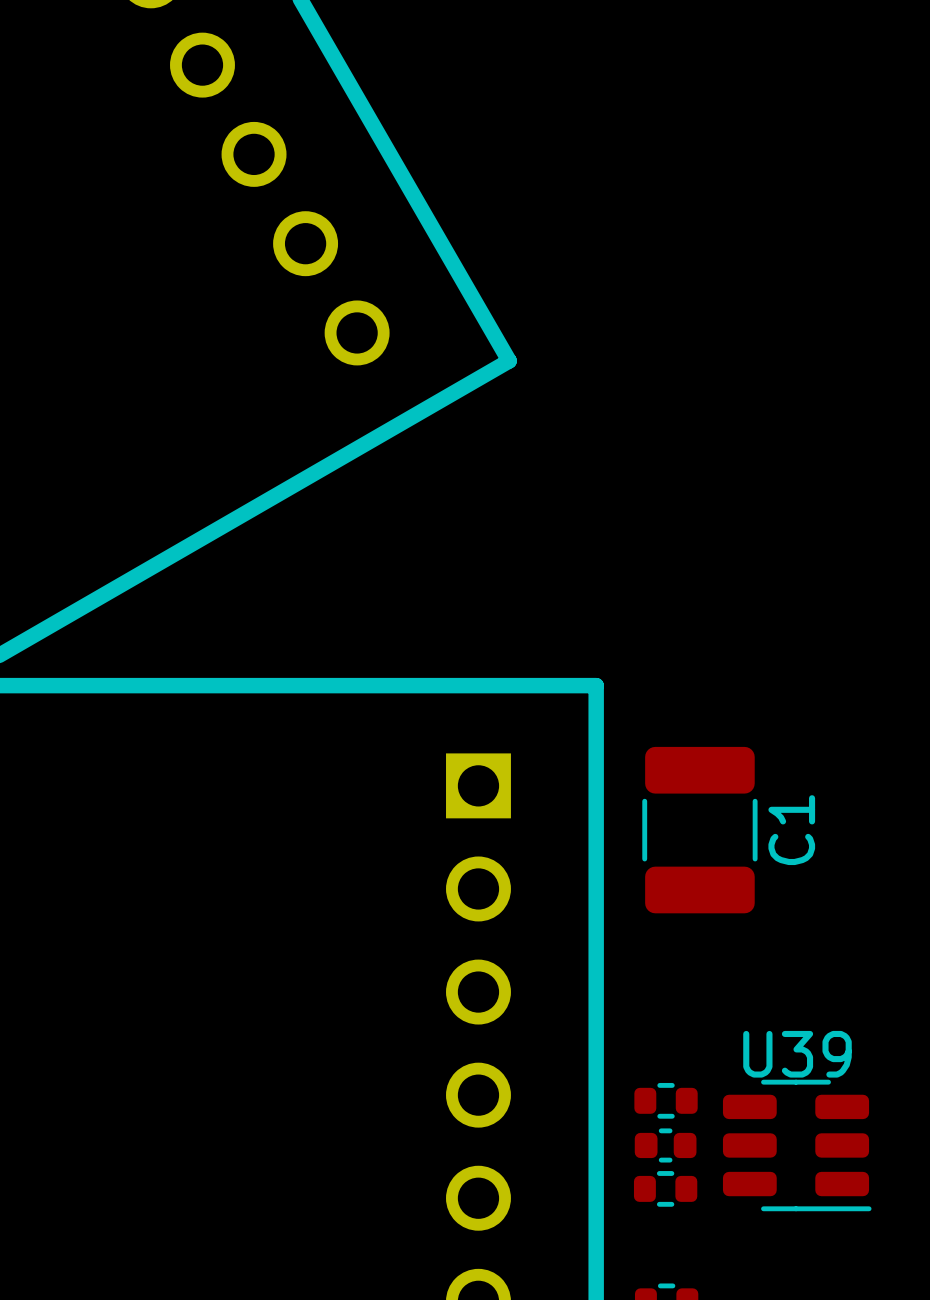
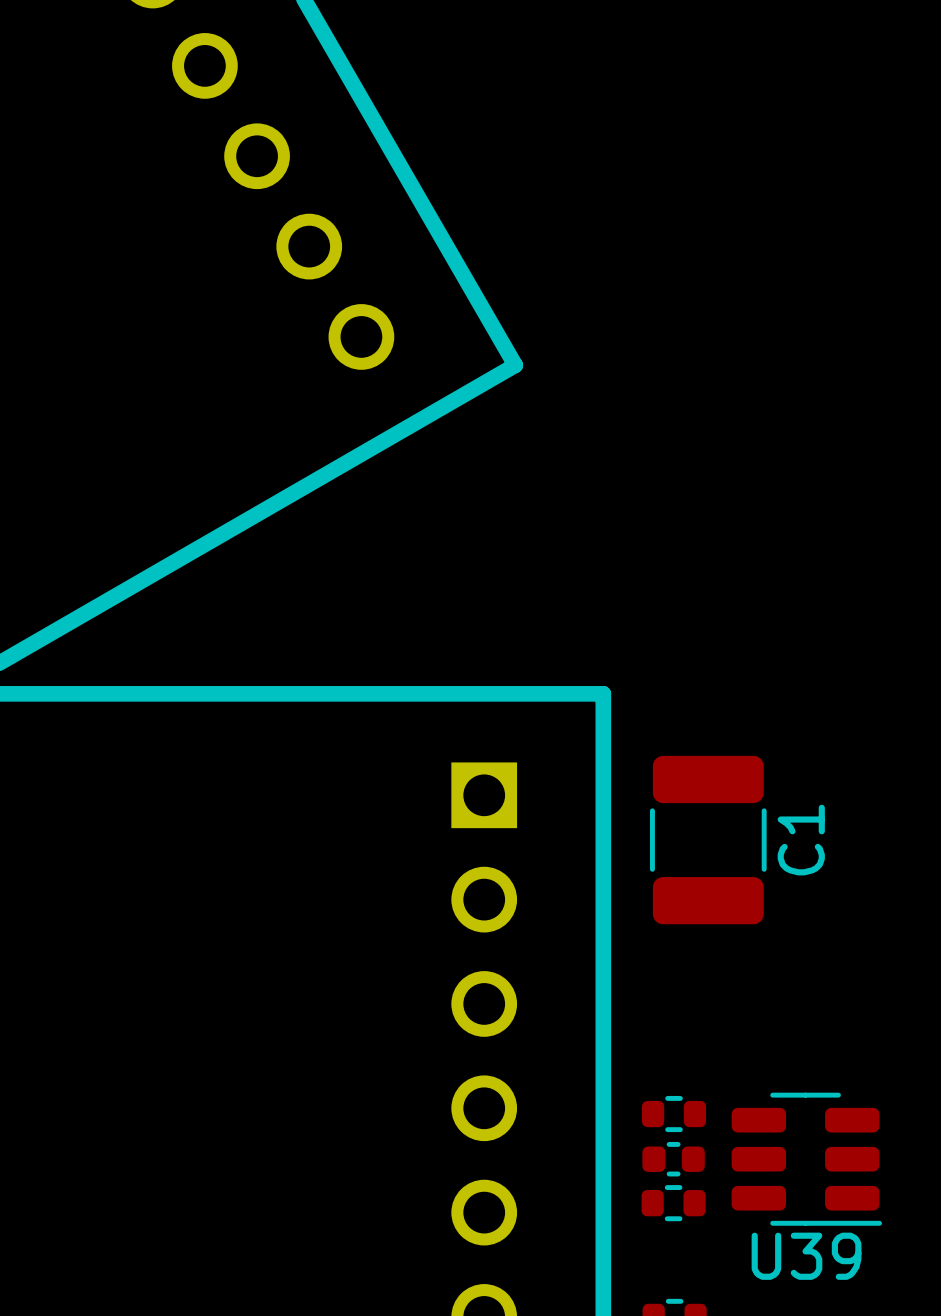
U39 name position: U39 (797, 1054) -> U39 (806, 1256)

